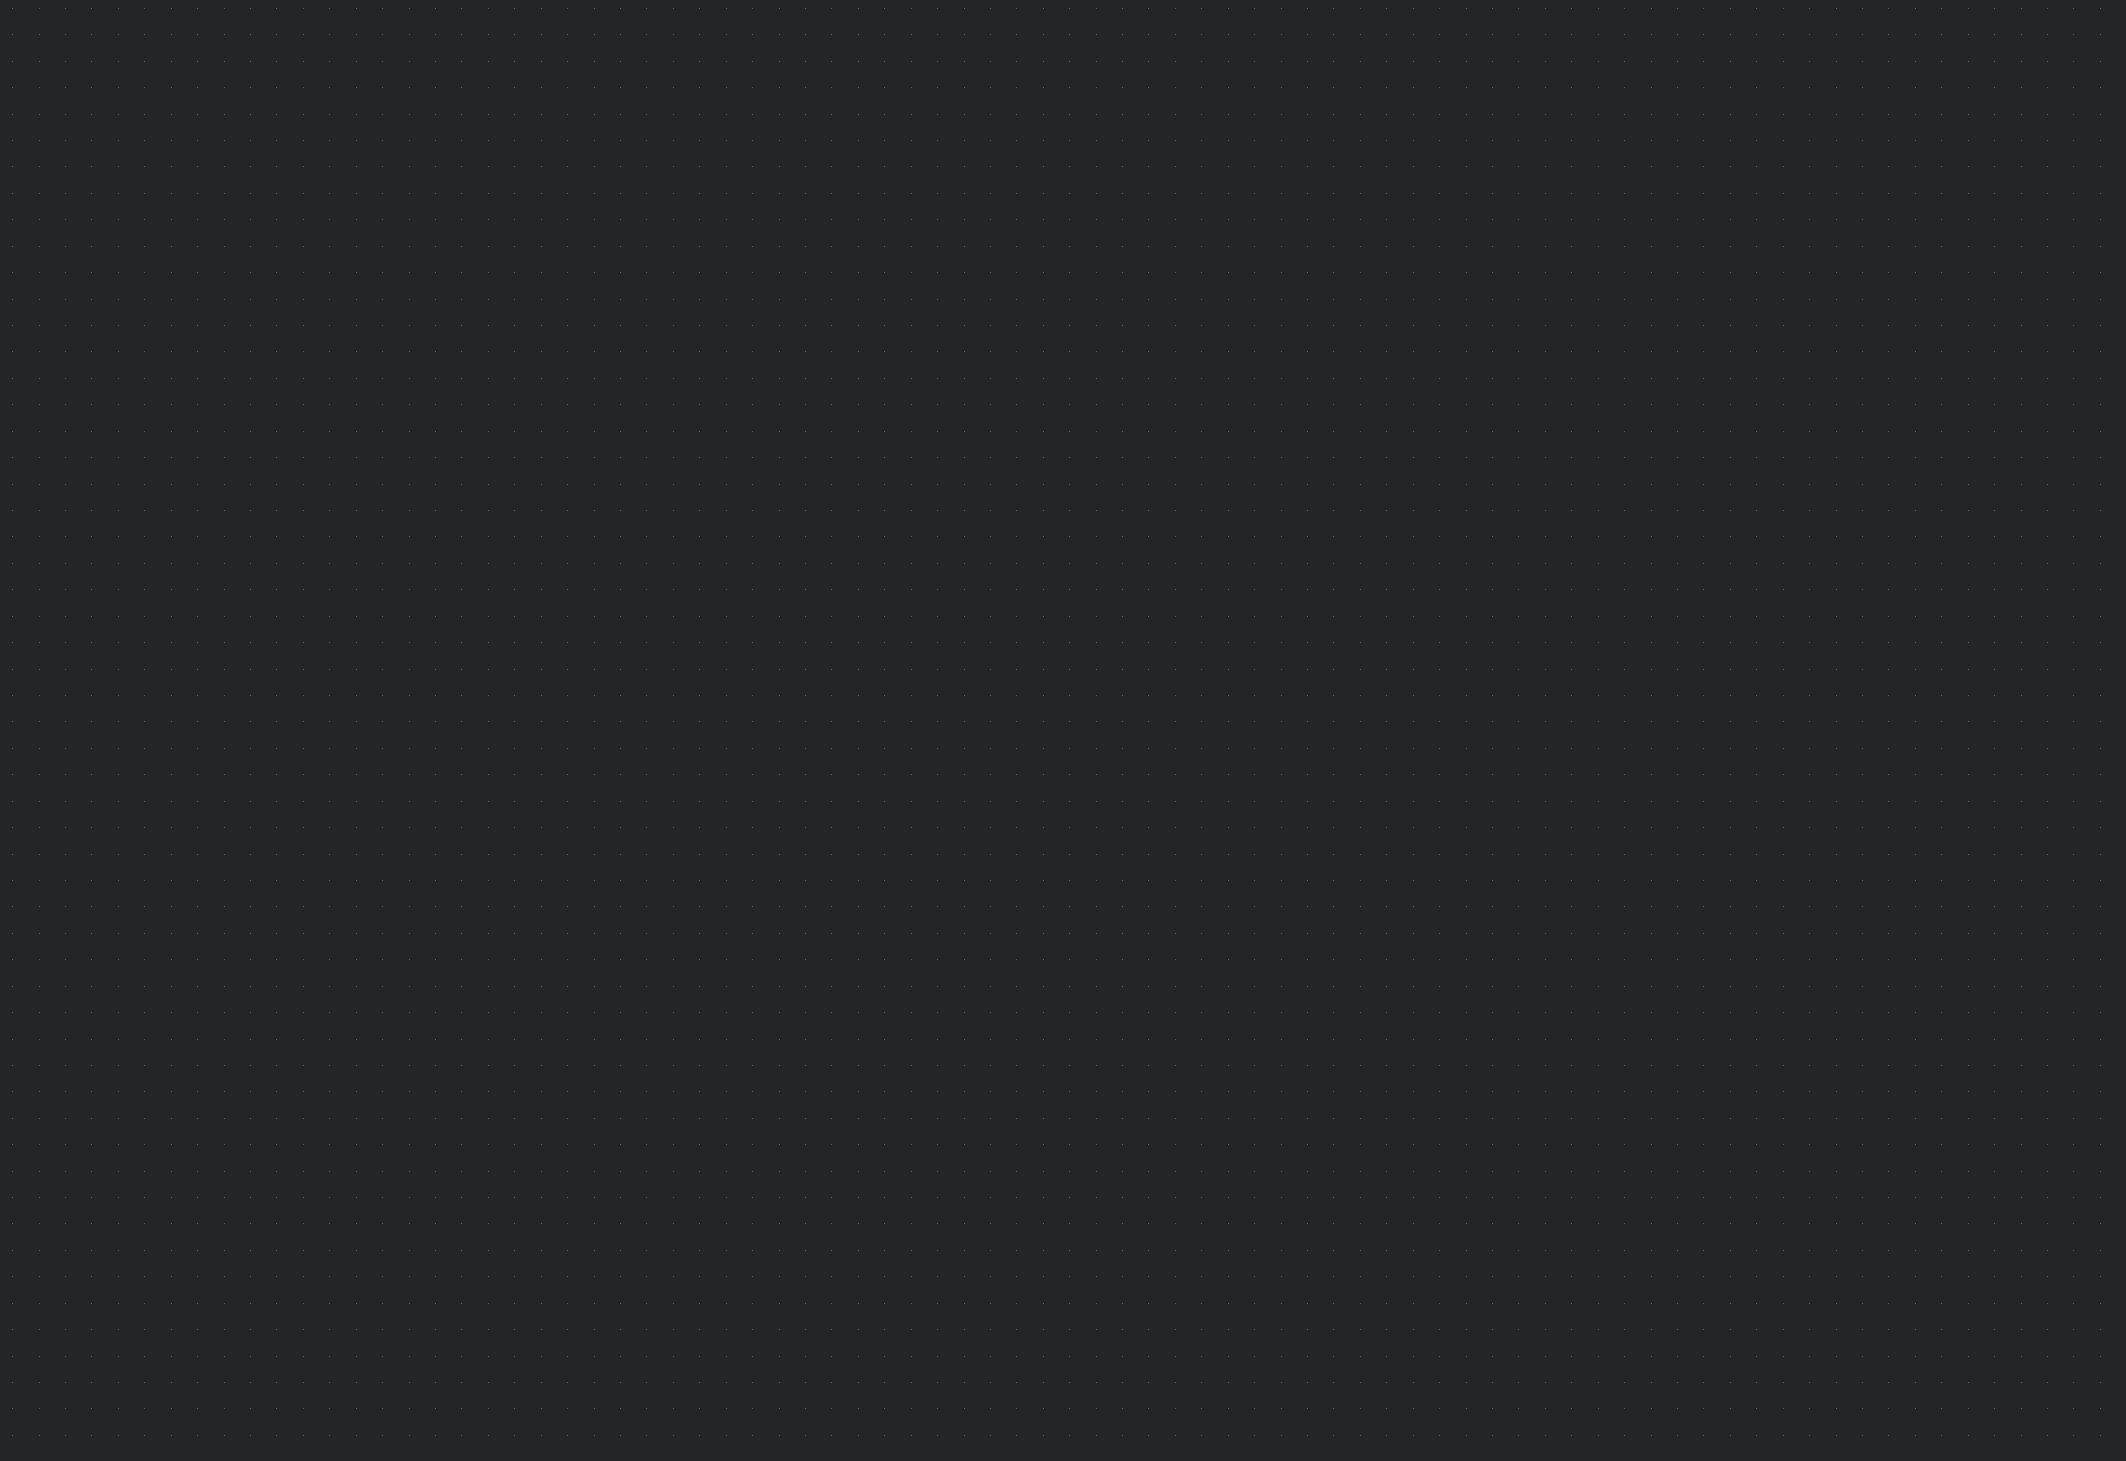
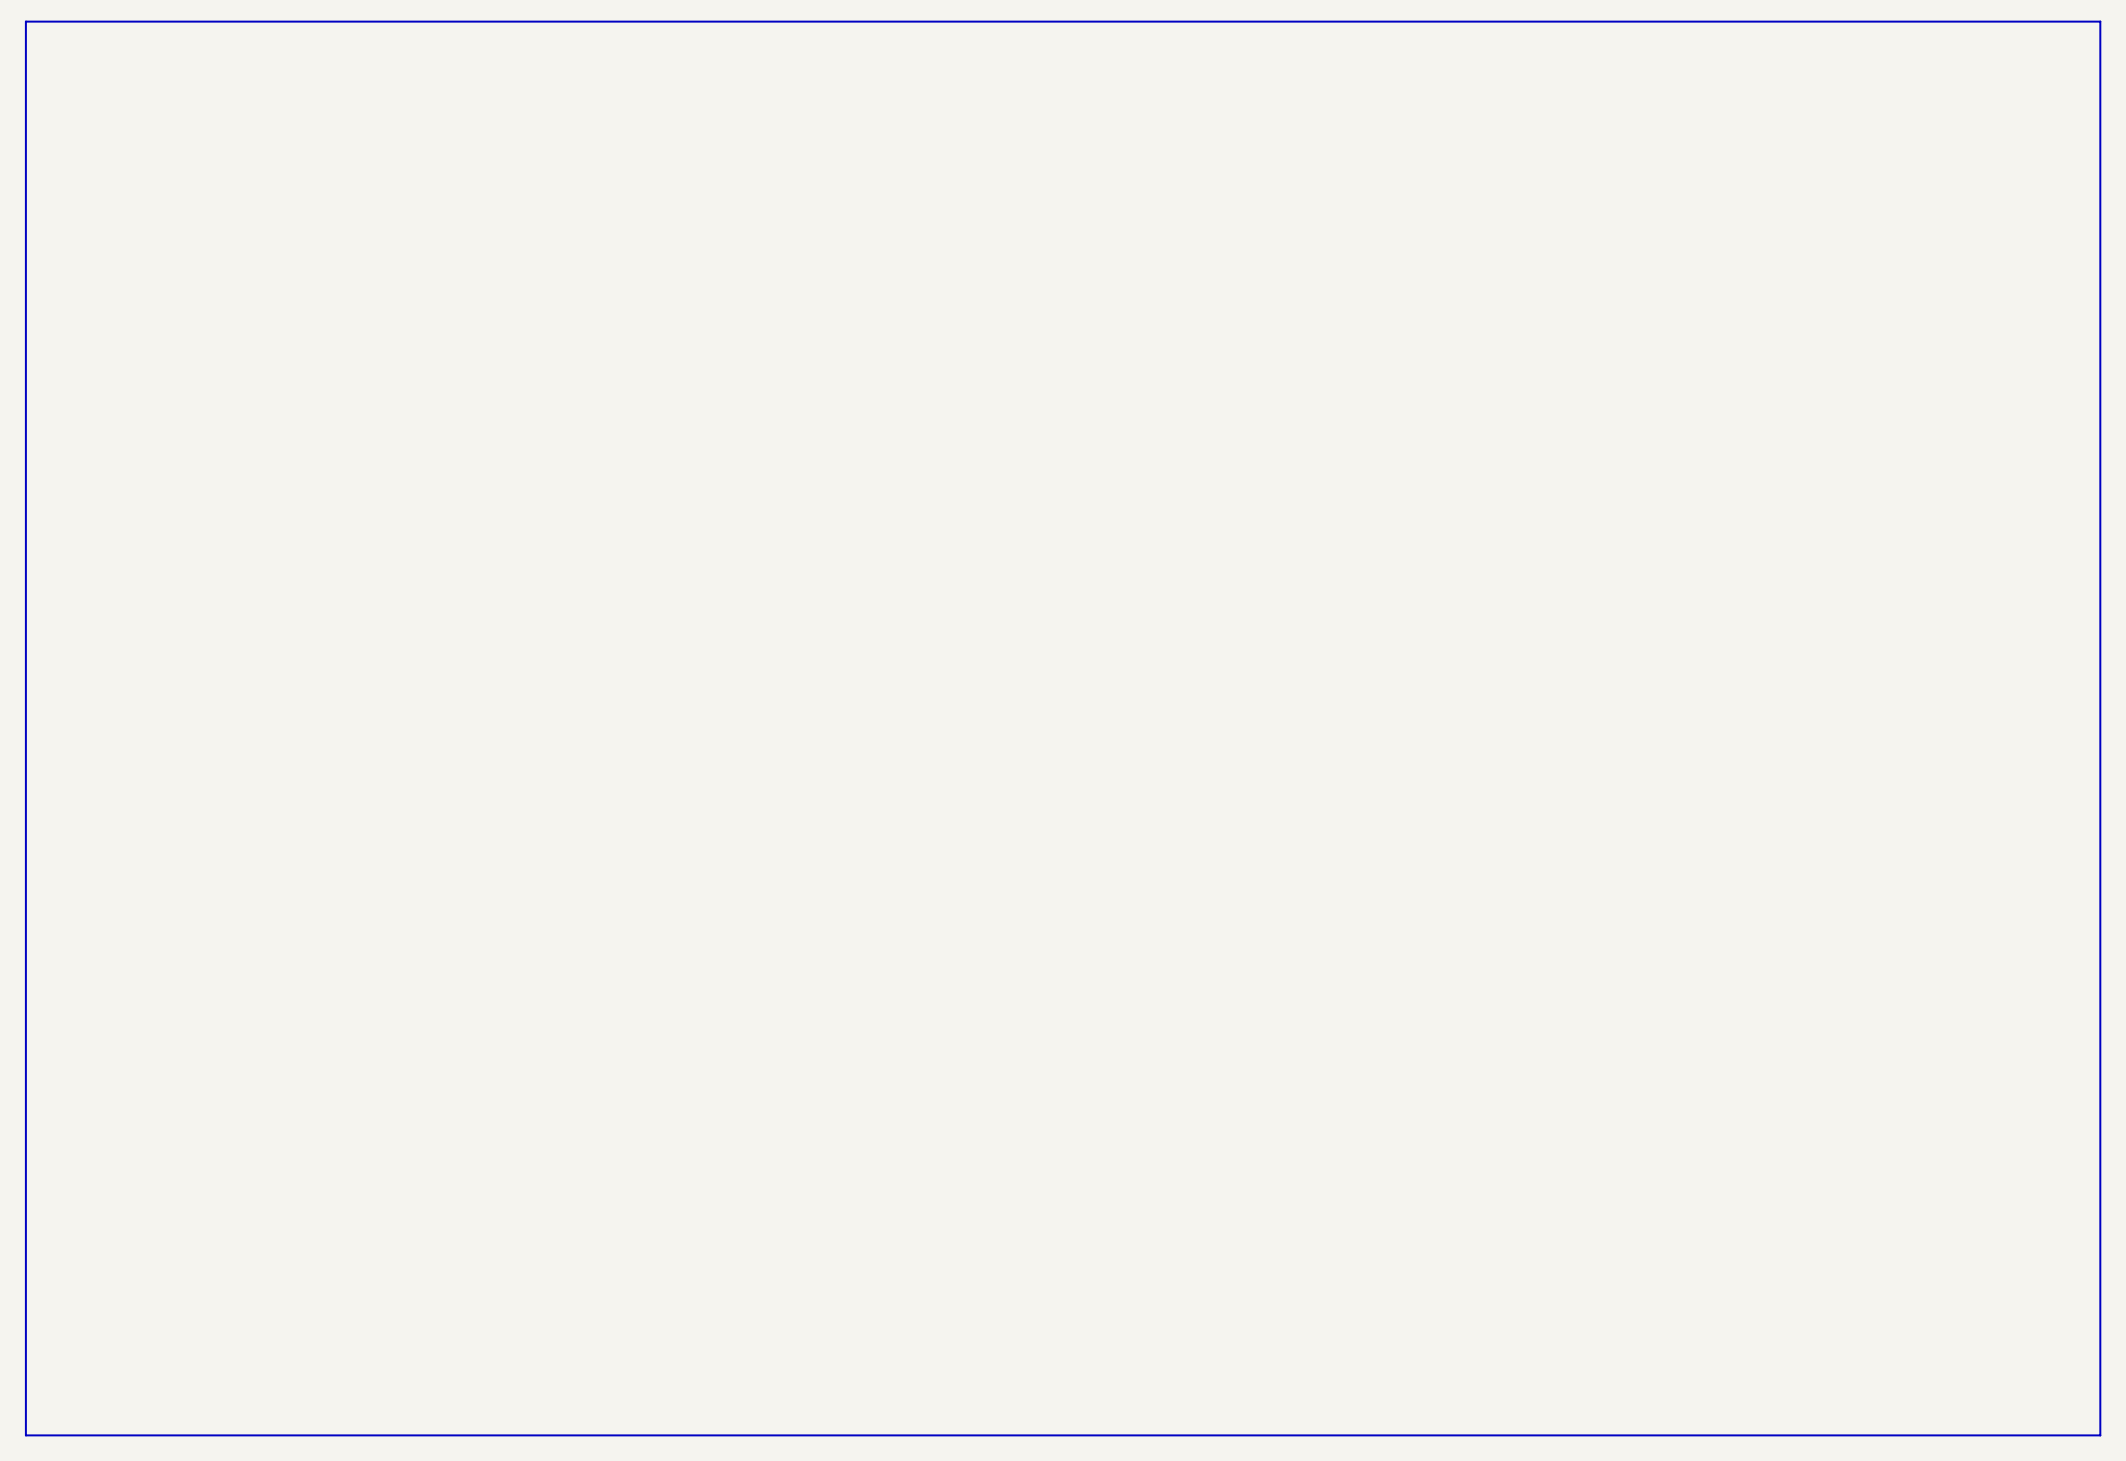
line: none -> (25, 21) (2100, 21) (2100, 1435) (25, 1435) (25, 21)

